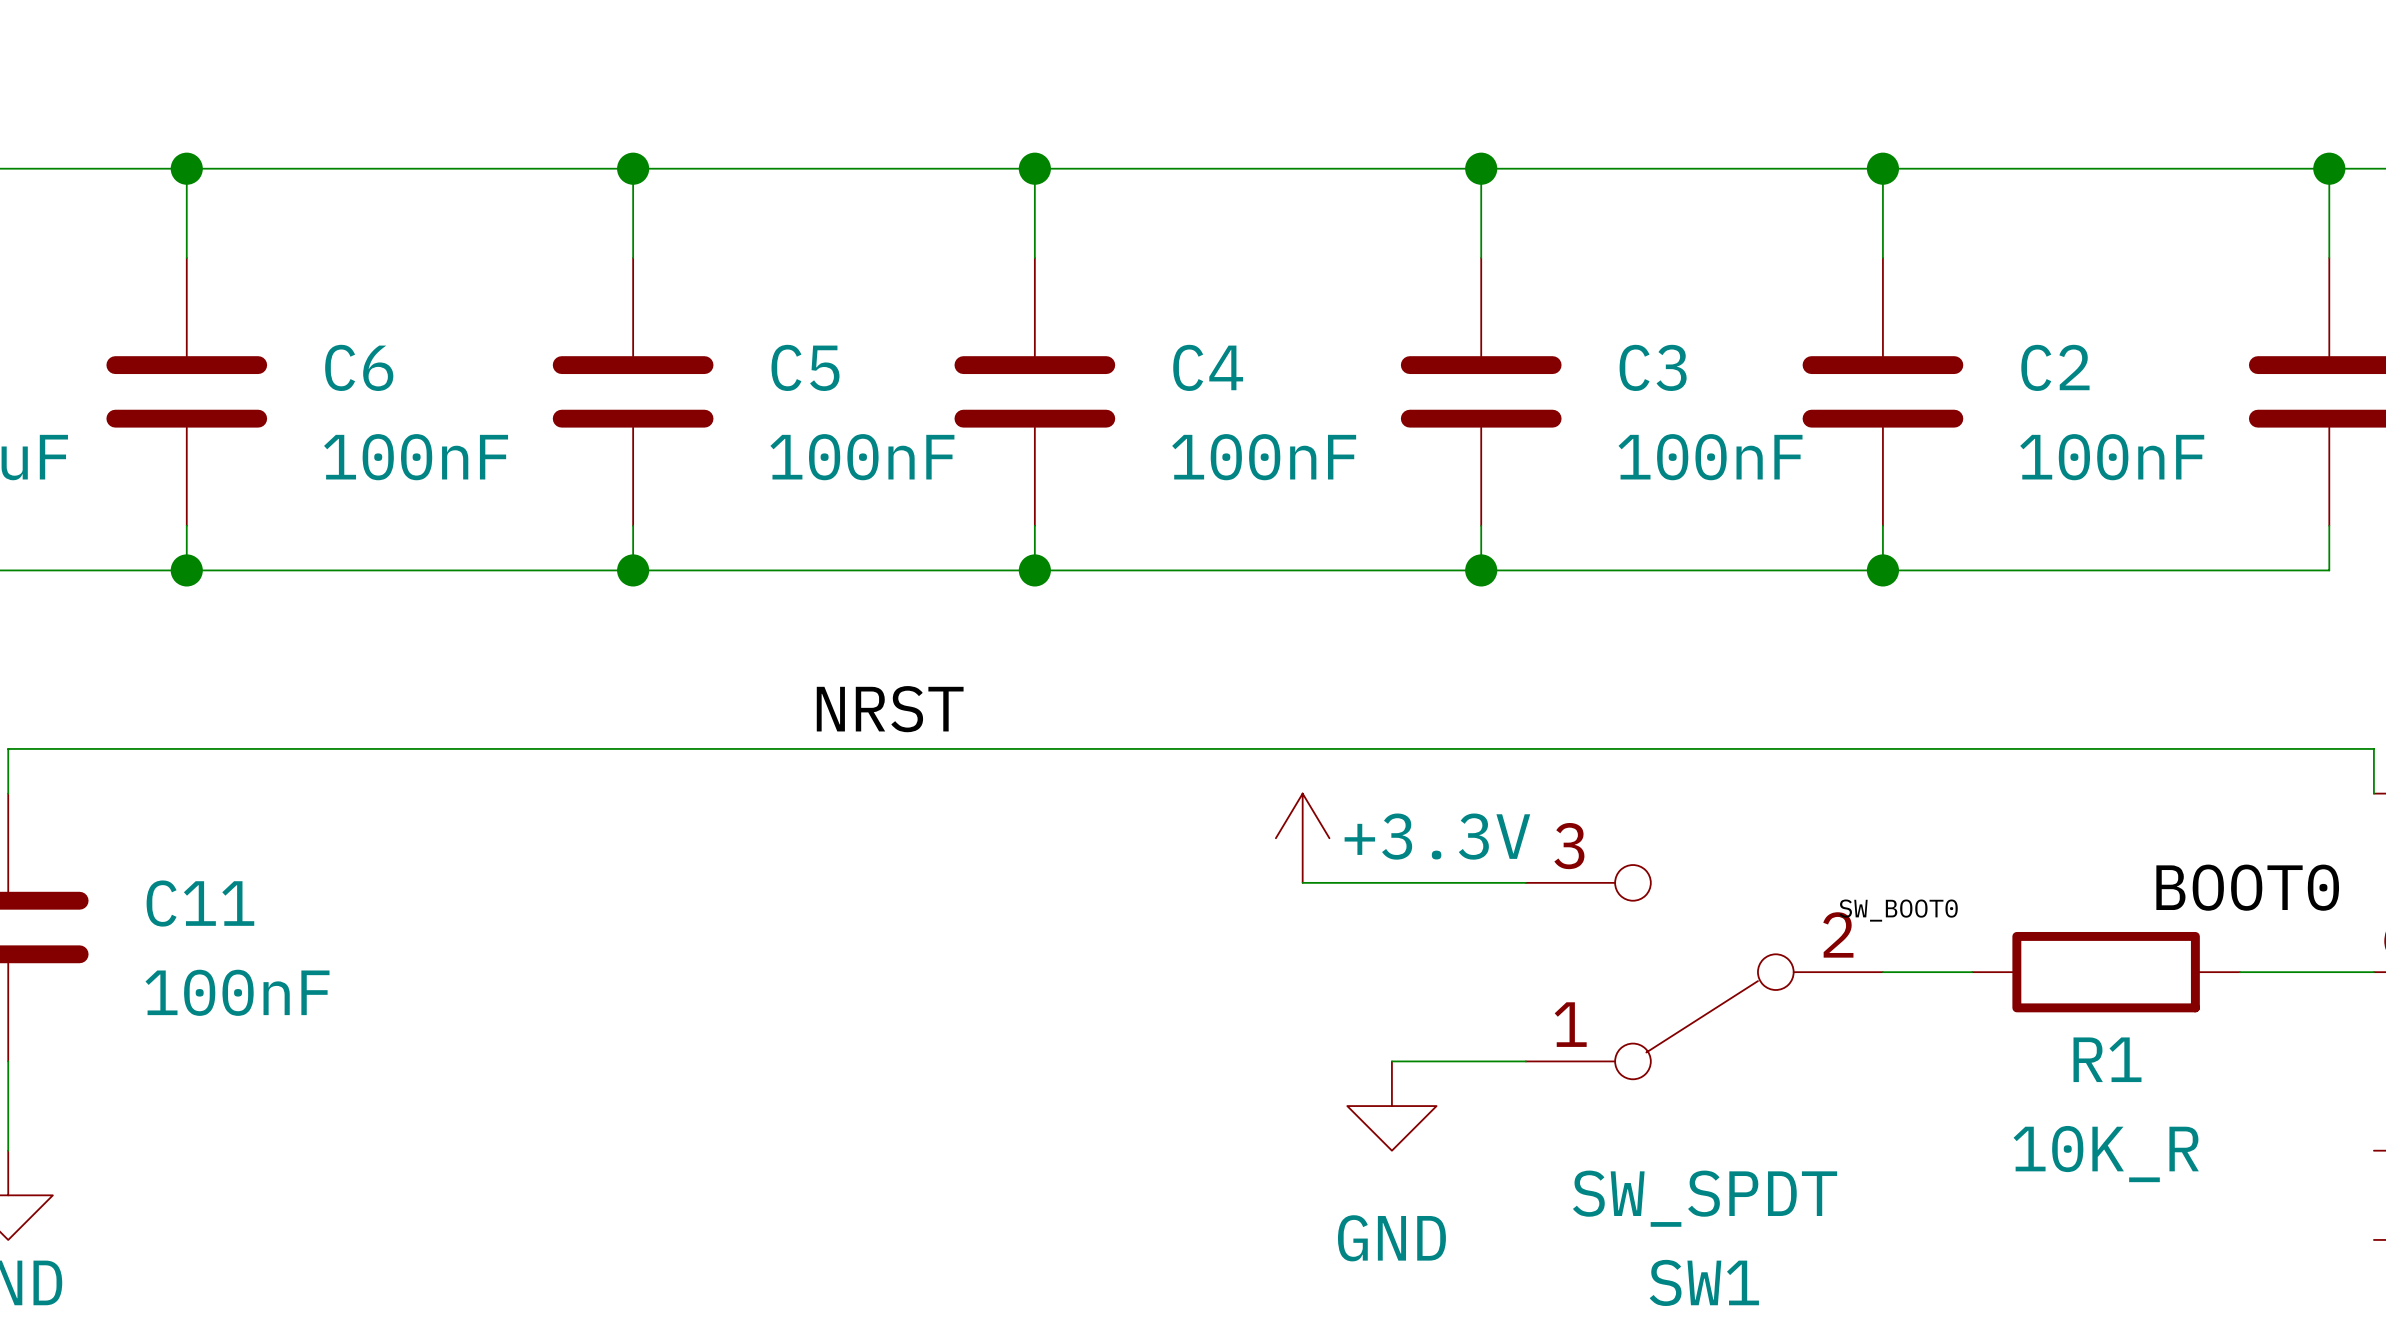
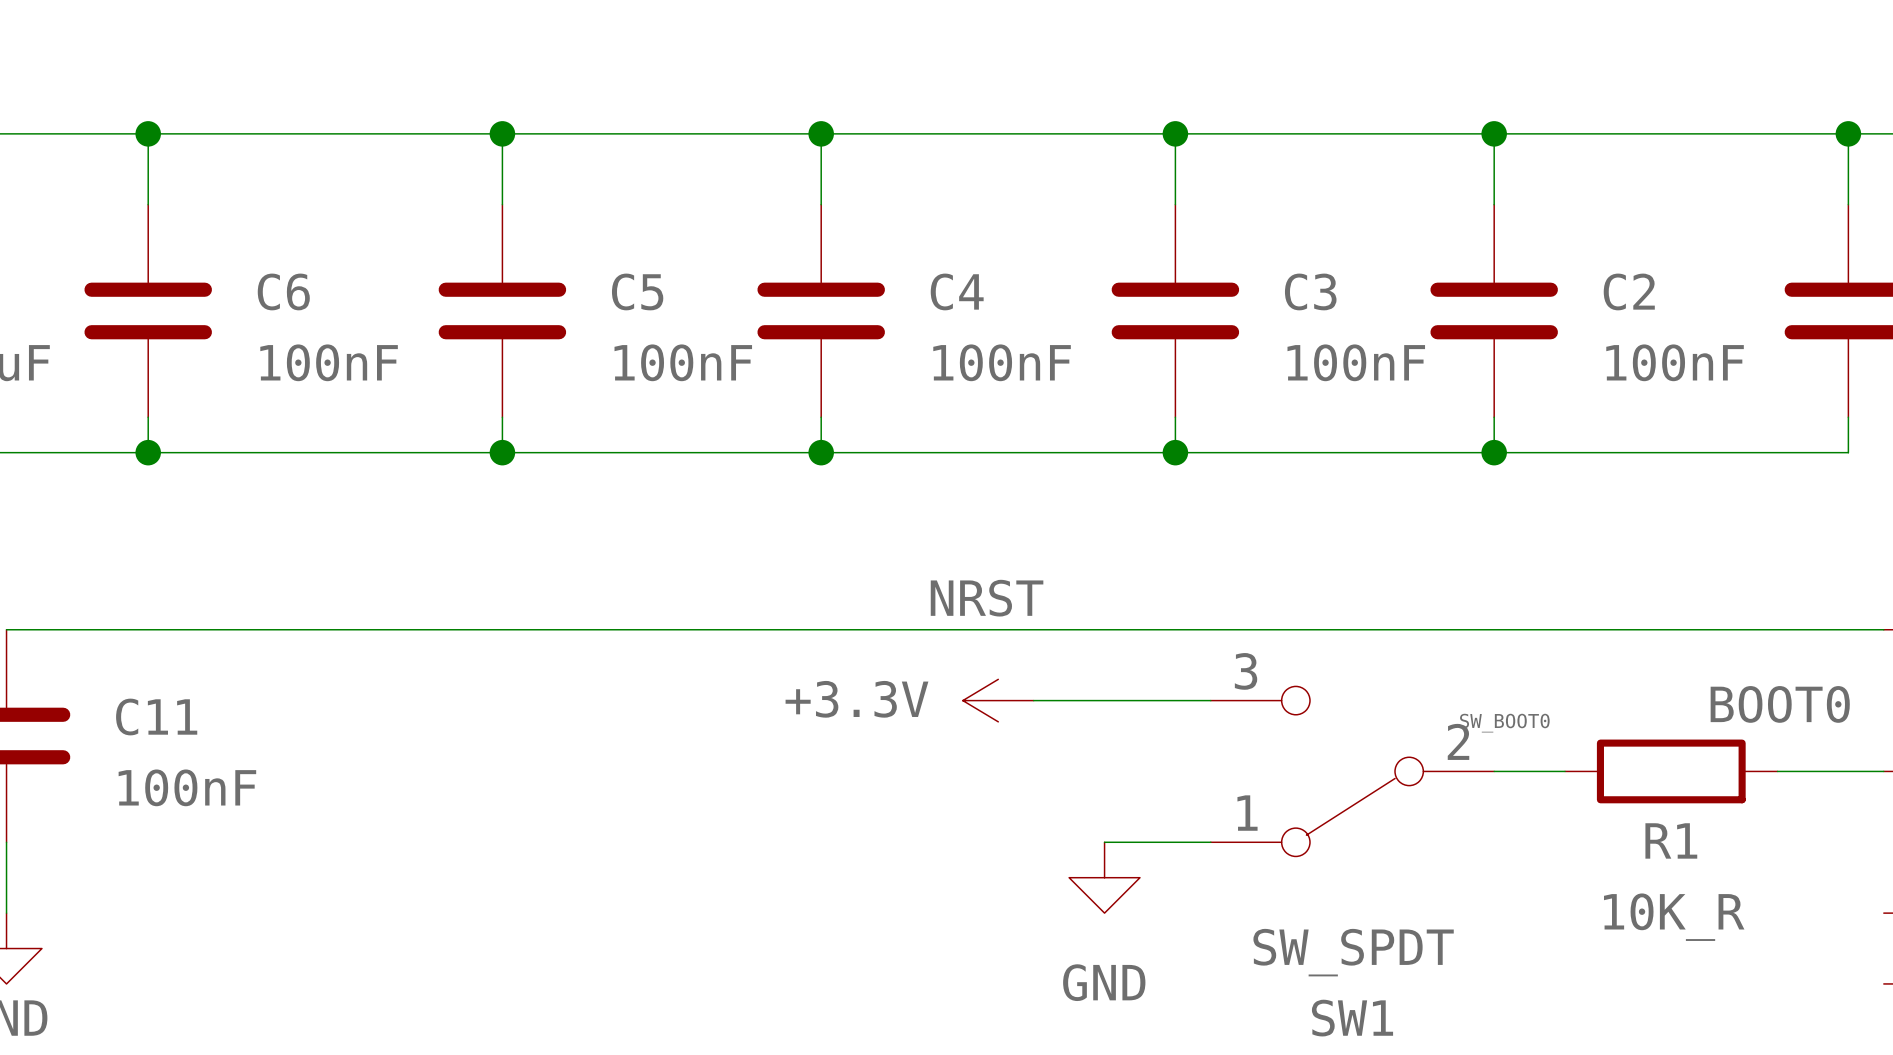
label position: NRST (890, 709) -> NRST (987, 598)
wire: (8, 793) (8, 748) (2373, 748) (2373, 793) -> (6, 629) (1883, 629)
power symbol text position: +3.3V (1437, 836) -> +3.3V (856, 699)
power symbol rotation: 0° (1302, 838) -> 90° counterclockwise (998, 700)
power symbol position: +3.3V (1302, 838) -> +3.3V (998, 700)

